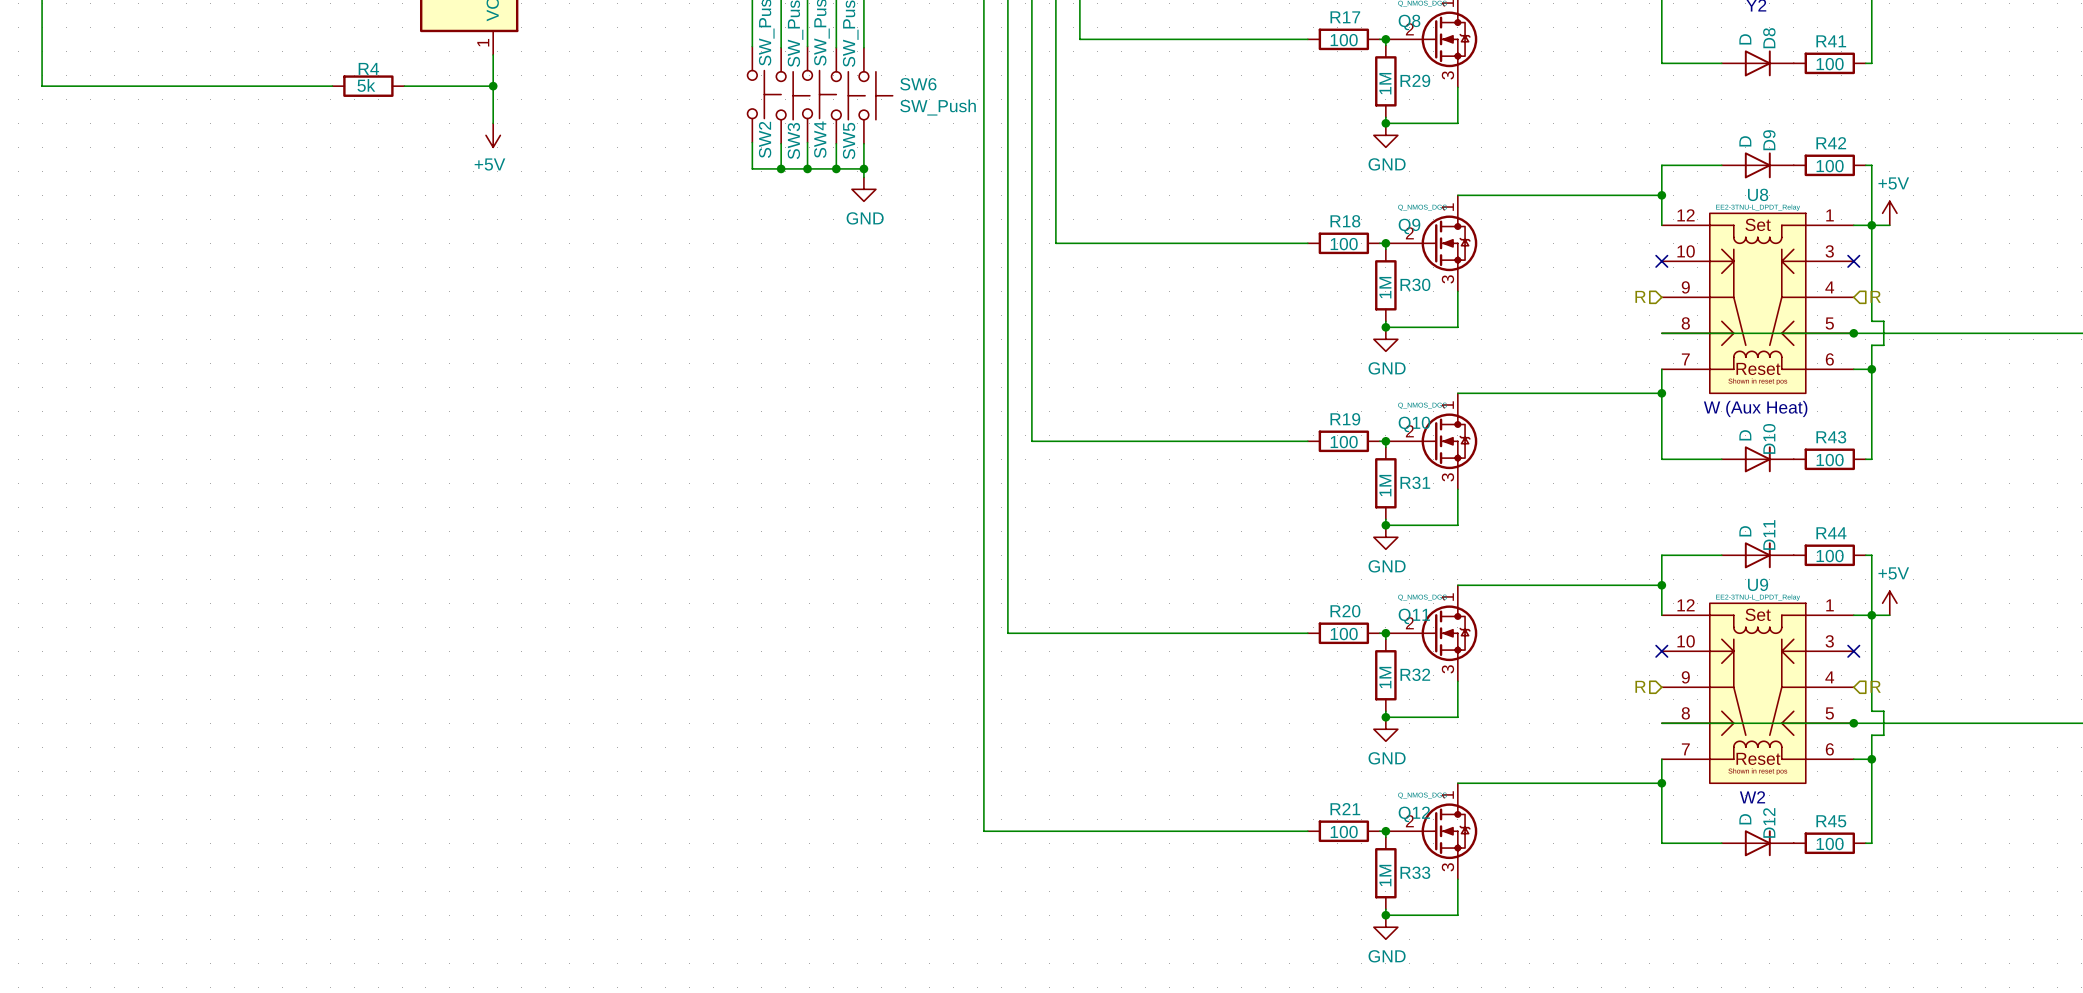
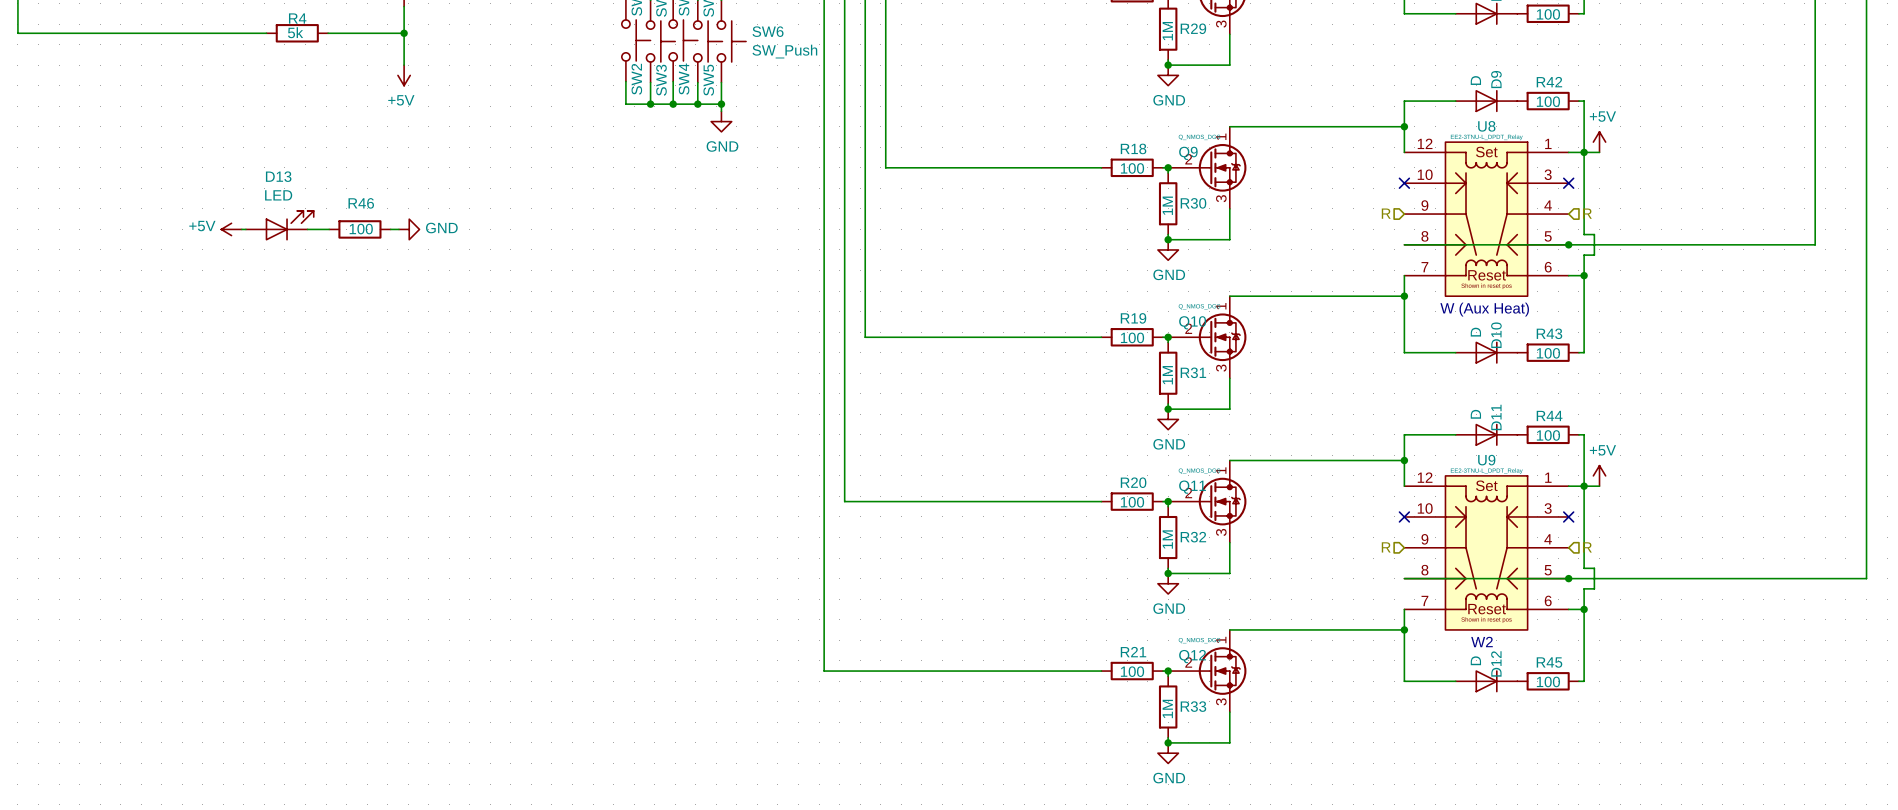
D13: none -> LED (279, 225)
power symbol: none -> +5V (231, 229)
wire: none -> (241, 229) (245, 229)
wire: none -> (307, 229) (329, 229)
R46: none -> 100 (359, 229)
wire: none -> (390, 229) (398, 229)
power symbol: none -> GND (409, 229)

